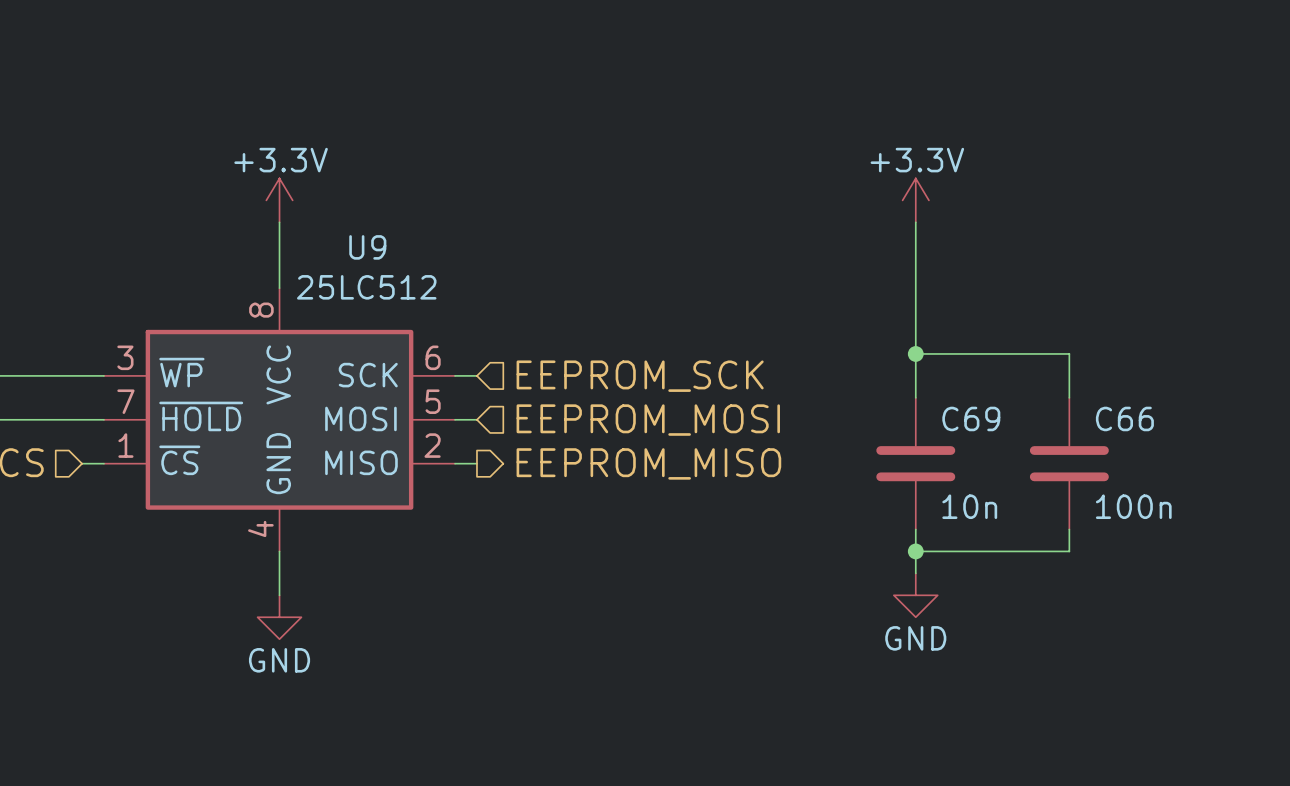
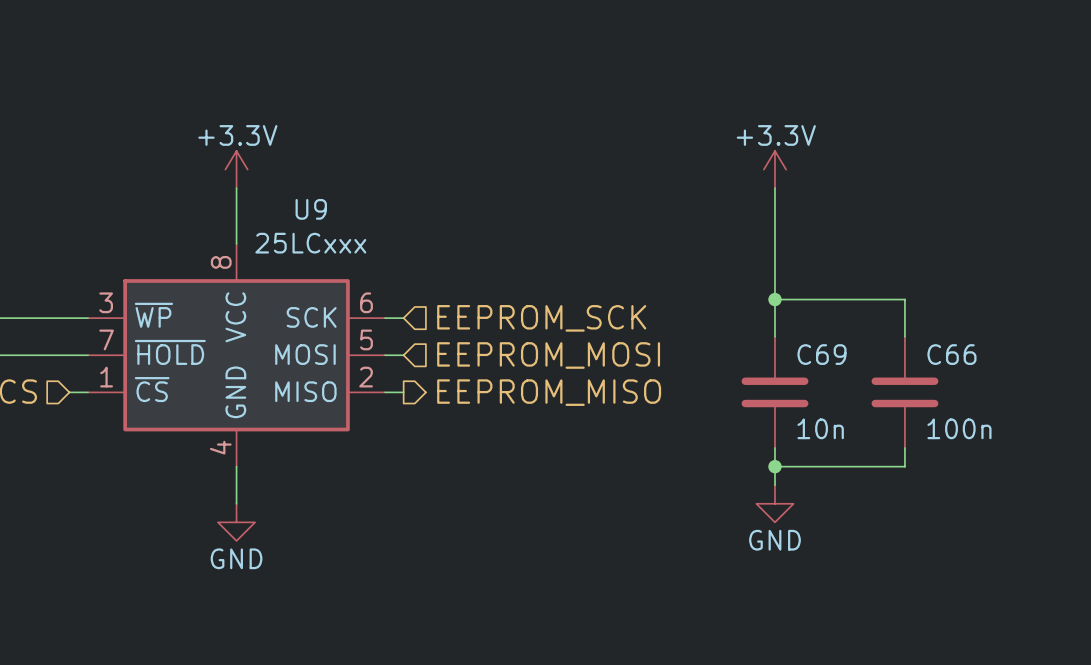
U9 value: 25LC512 (366, 287) -> 25LCxxx (310, 243)

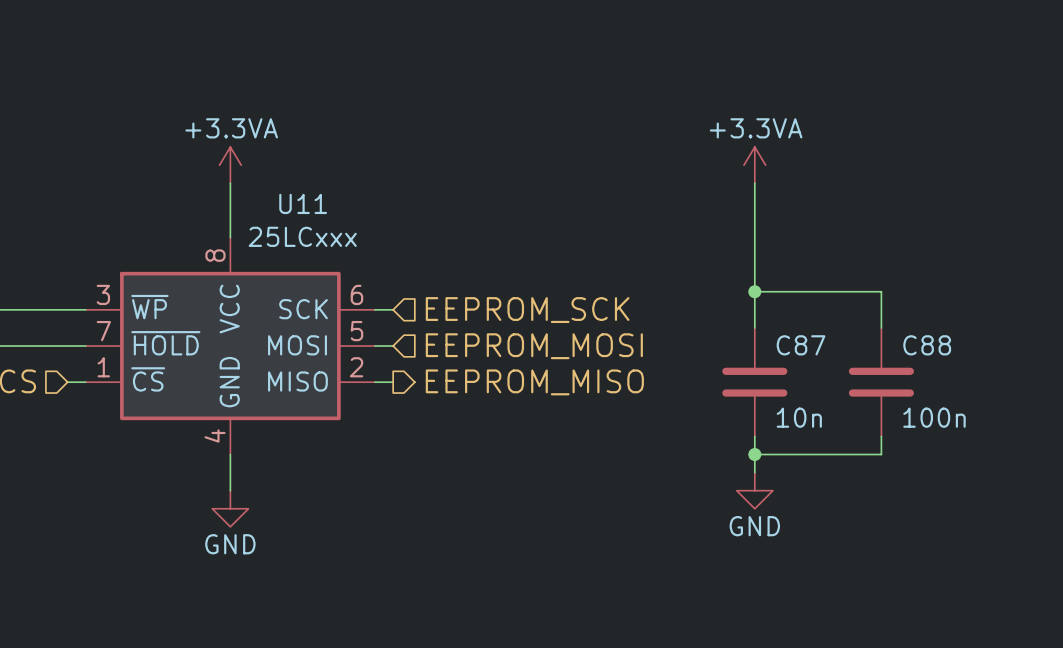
power symbol: +3.3V (236, 169) -> +3.3VA (230, 165)
power symbol: +3.3V (774, 169) -> +3.3VA (754, 165)
U9 name: U9 (311, 209) -> U11 (303, 203)
C69 name: C69 (821, 354) -> C87 (801, 345)
C66 name: C66 (951, 354) -> C88 (927, 345)

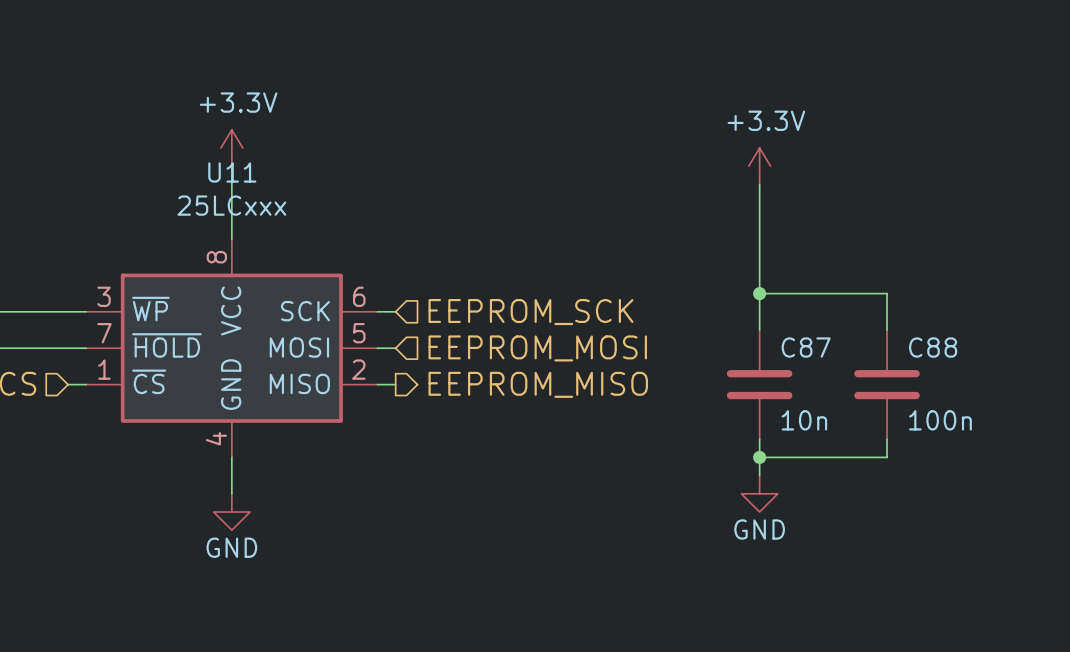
power symbol: none -> +3.3V (231, 148)
power symbol: +3.3VA (230, 165) -> none
power symbol: +3.3VA (754, 165) -> +3.3V (759, 166)
U11 name position: U11 (303, 203) -> U11 (232, 172)
U11 value position: 25LCxxx (302, 236) -> 25LCxxx (231, 205)

